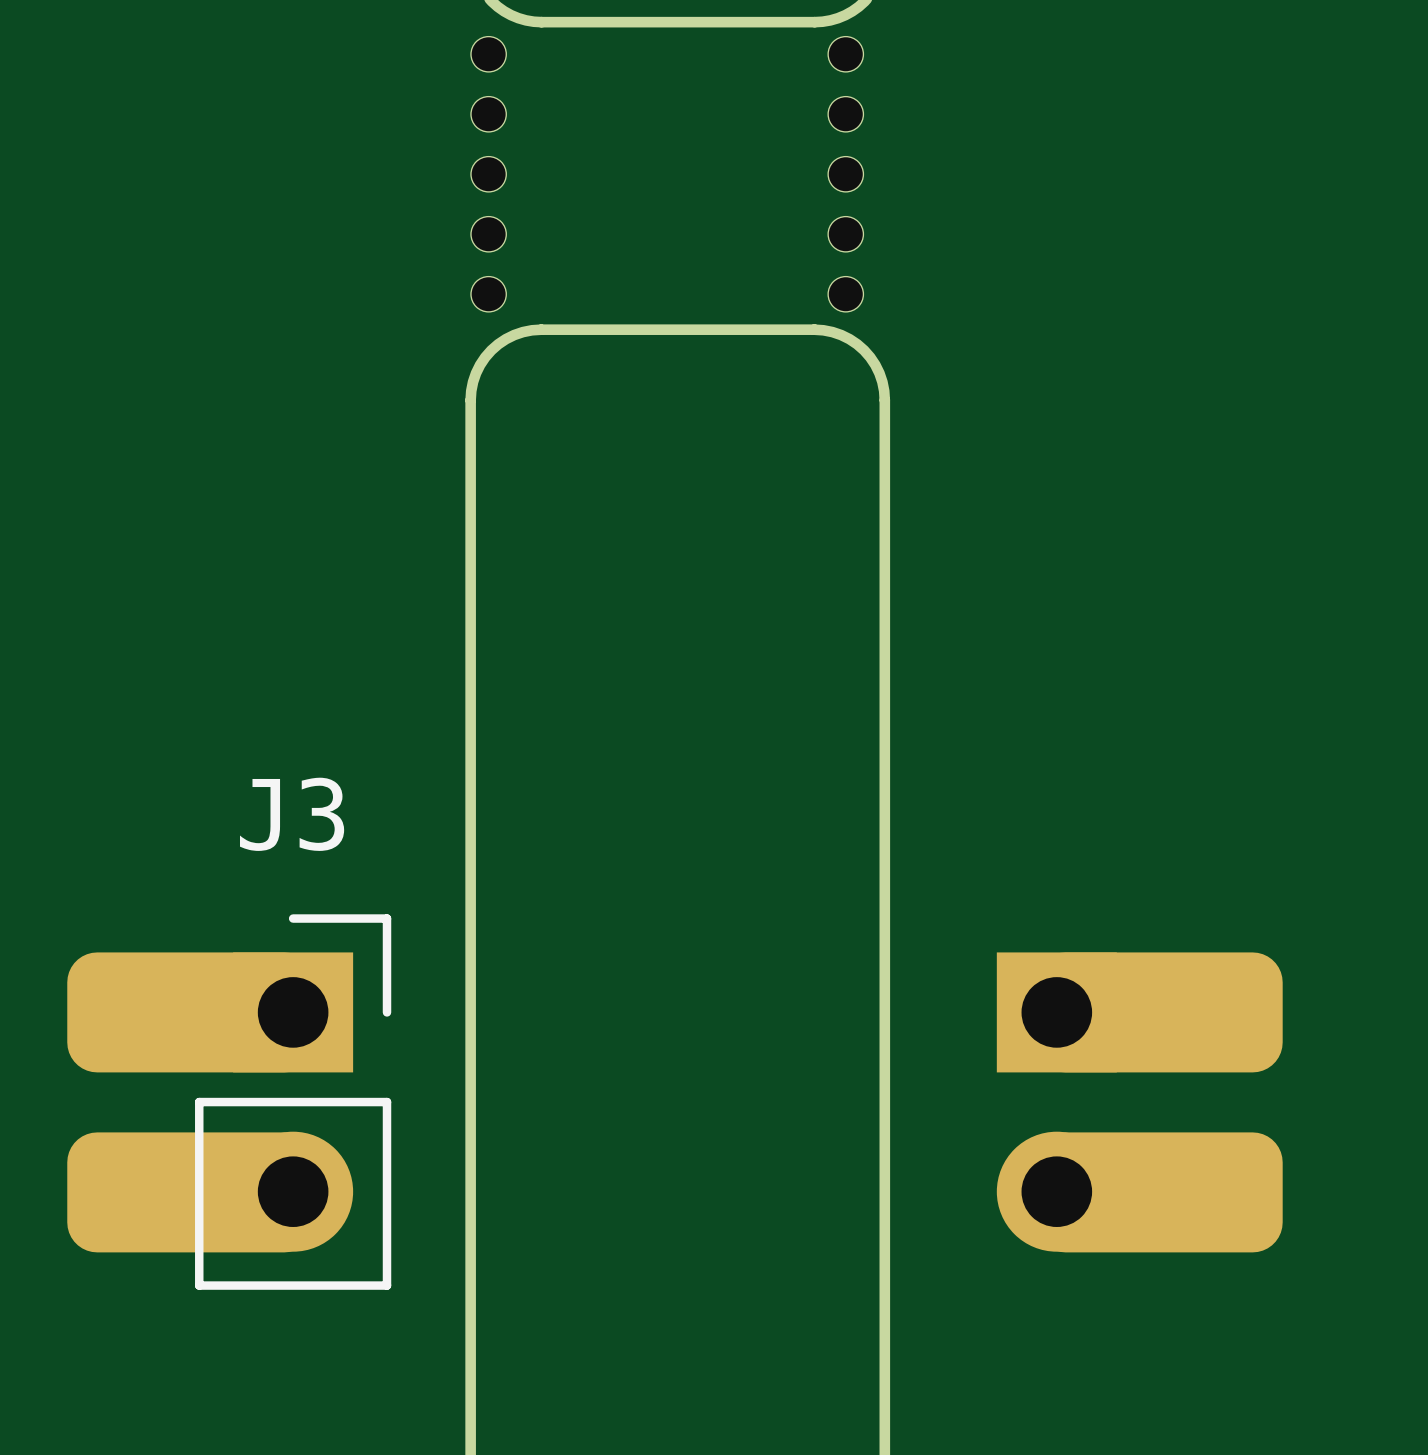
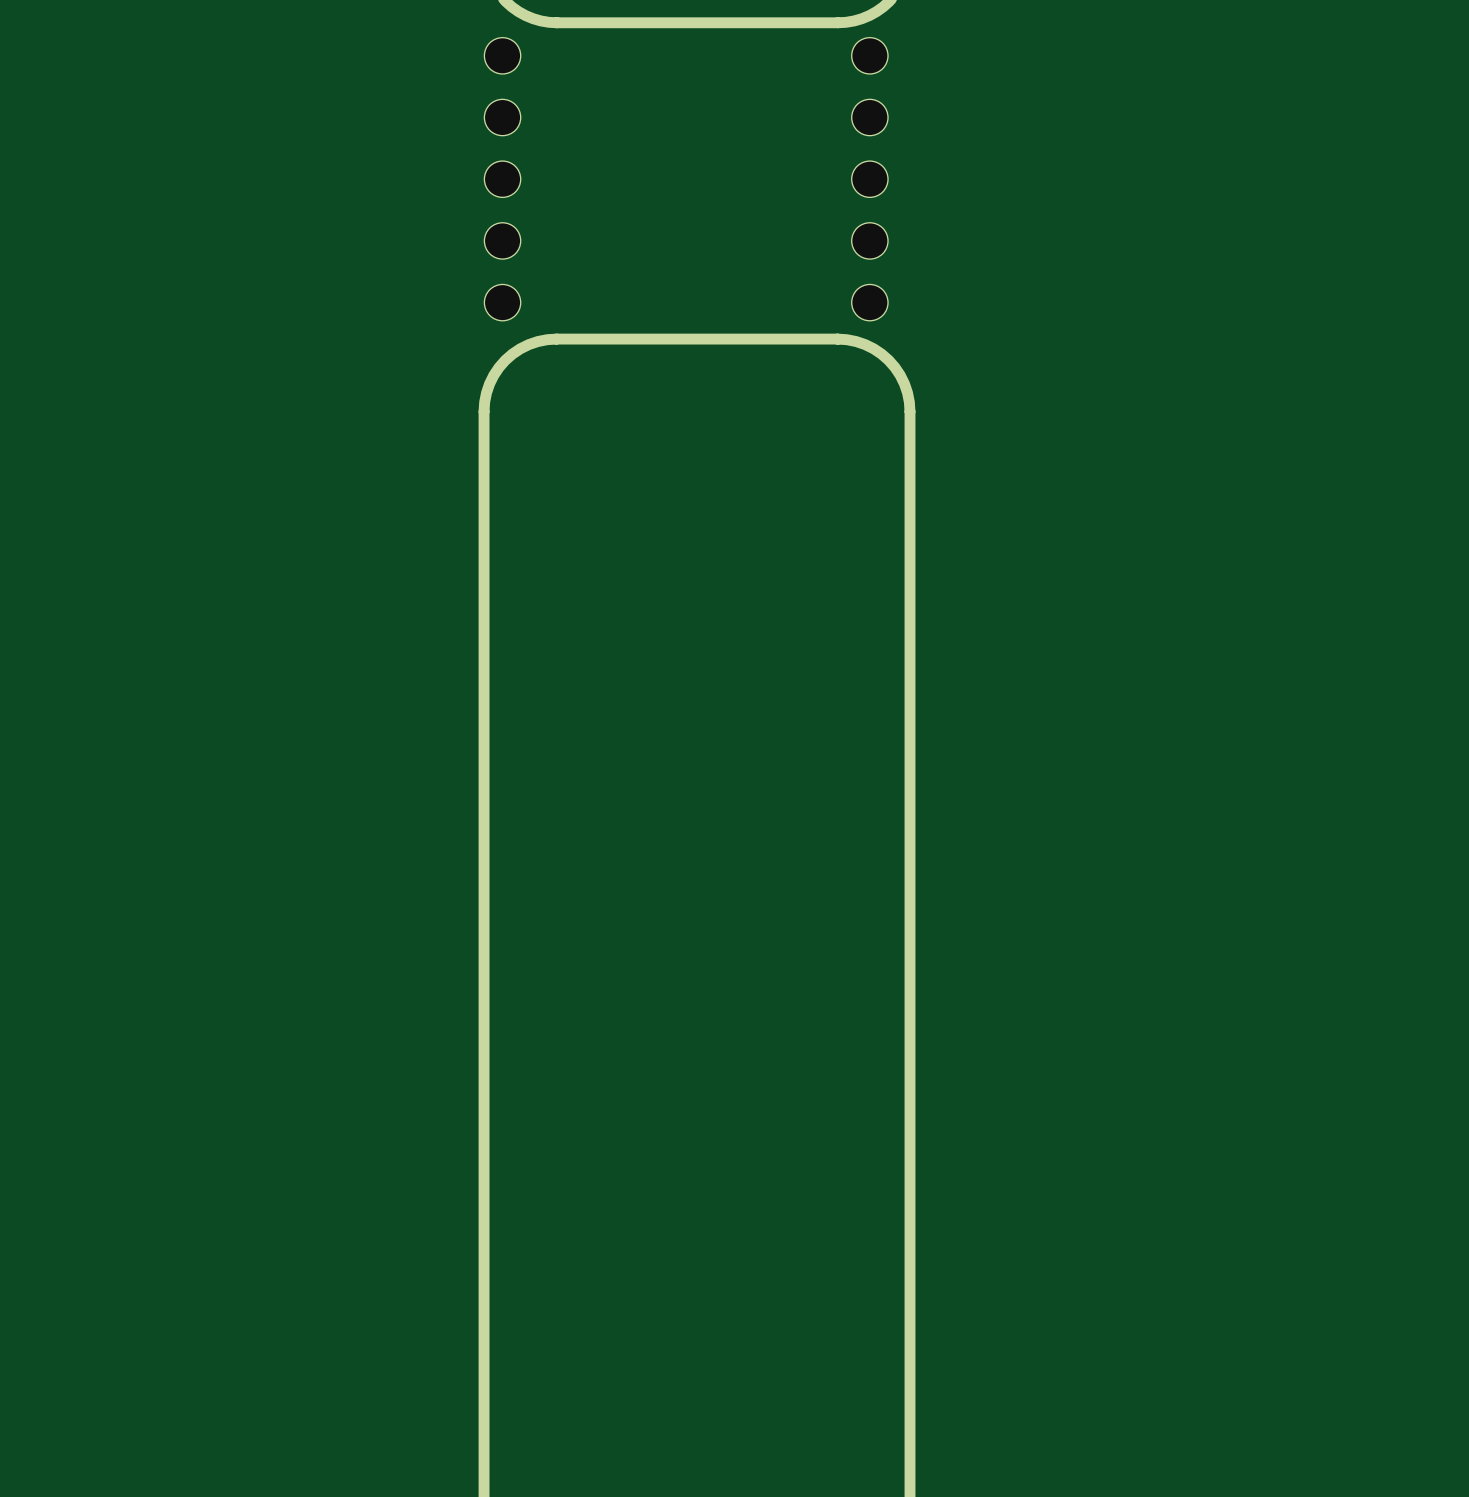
J3: (229, 1102) -> none
part: (1139, 1102) -> none

